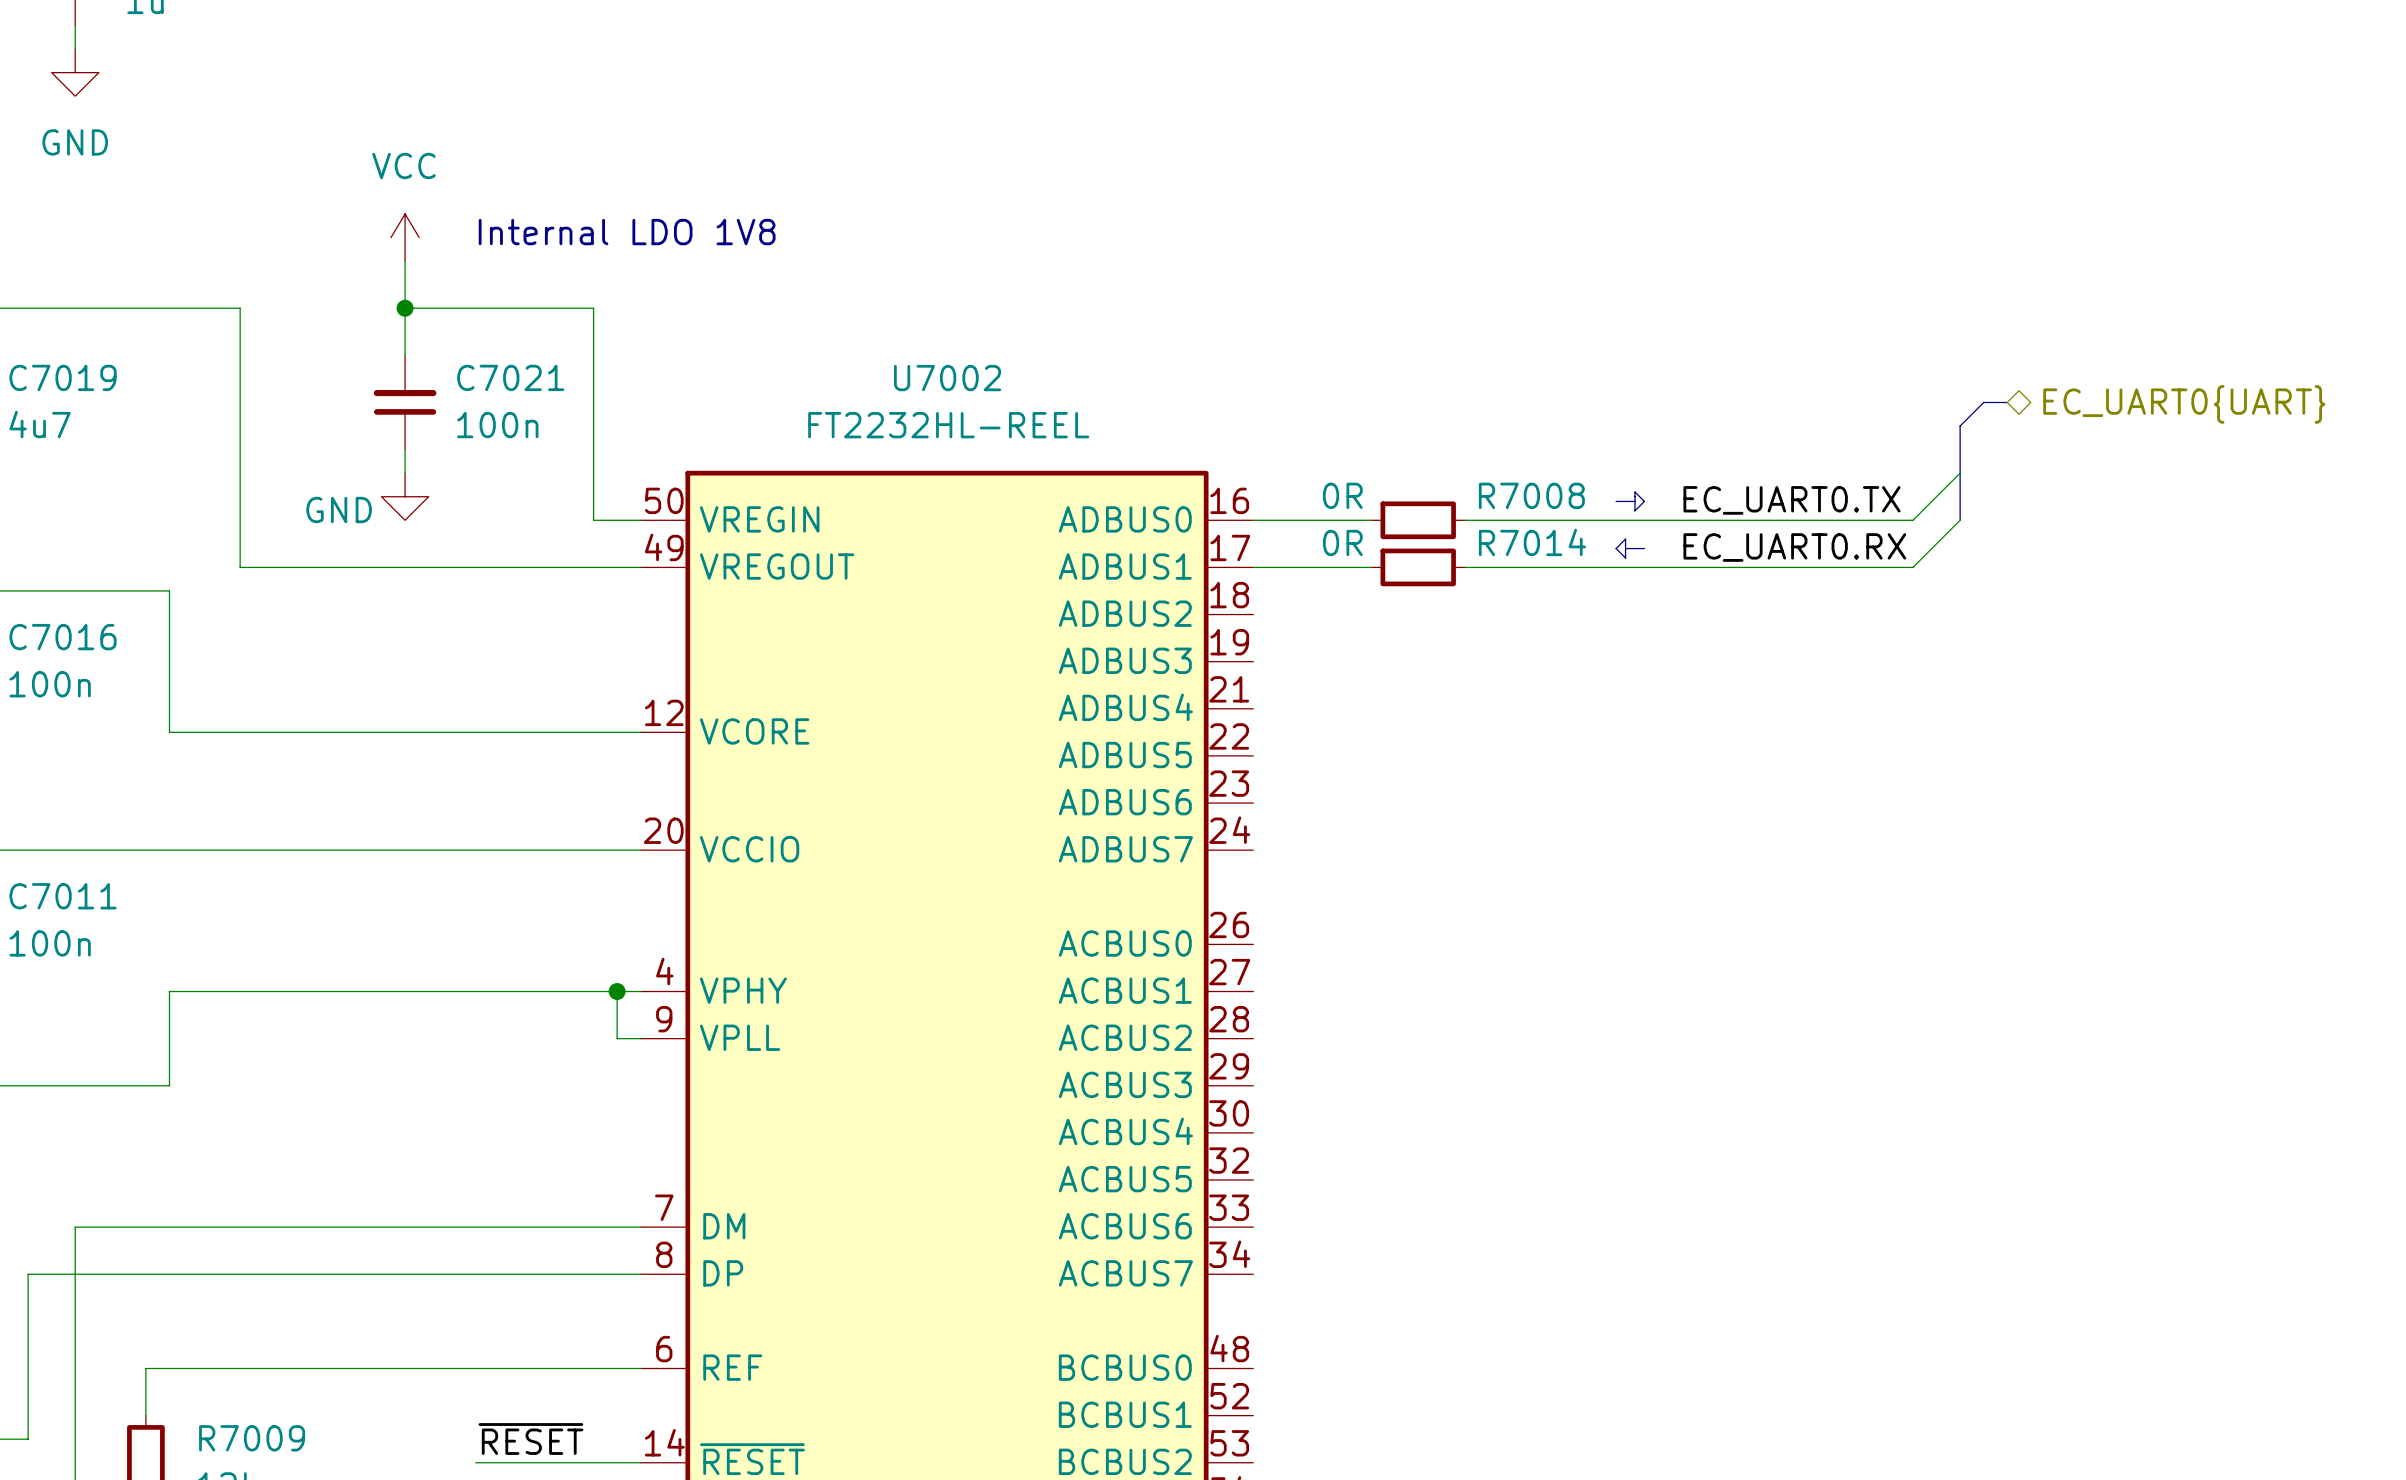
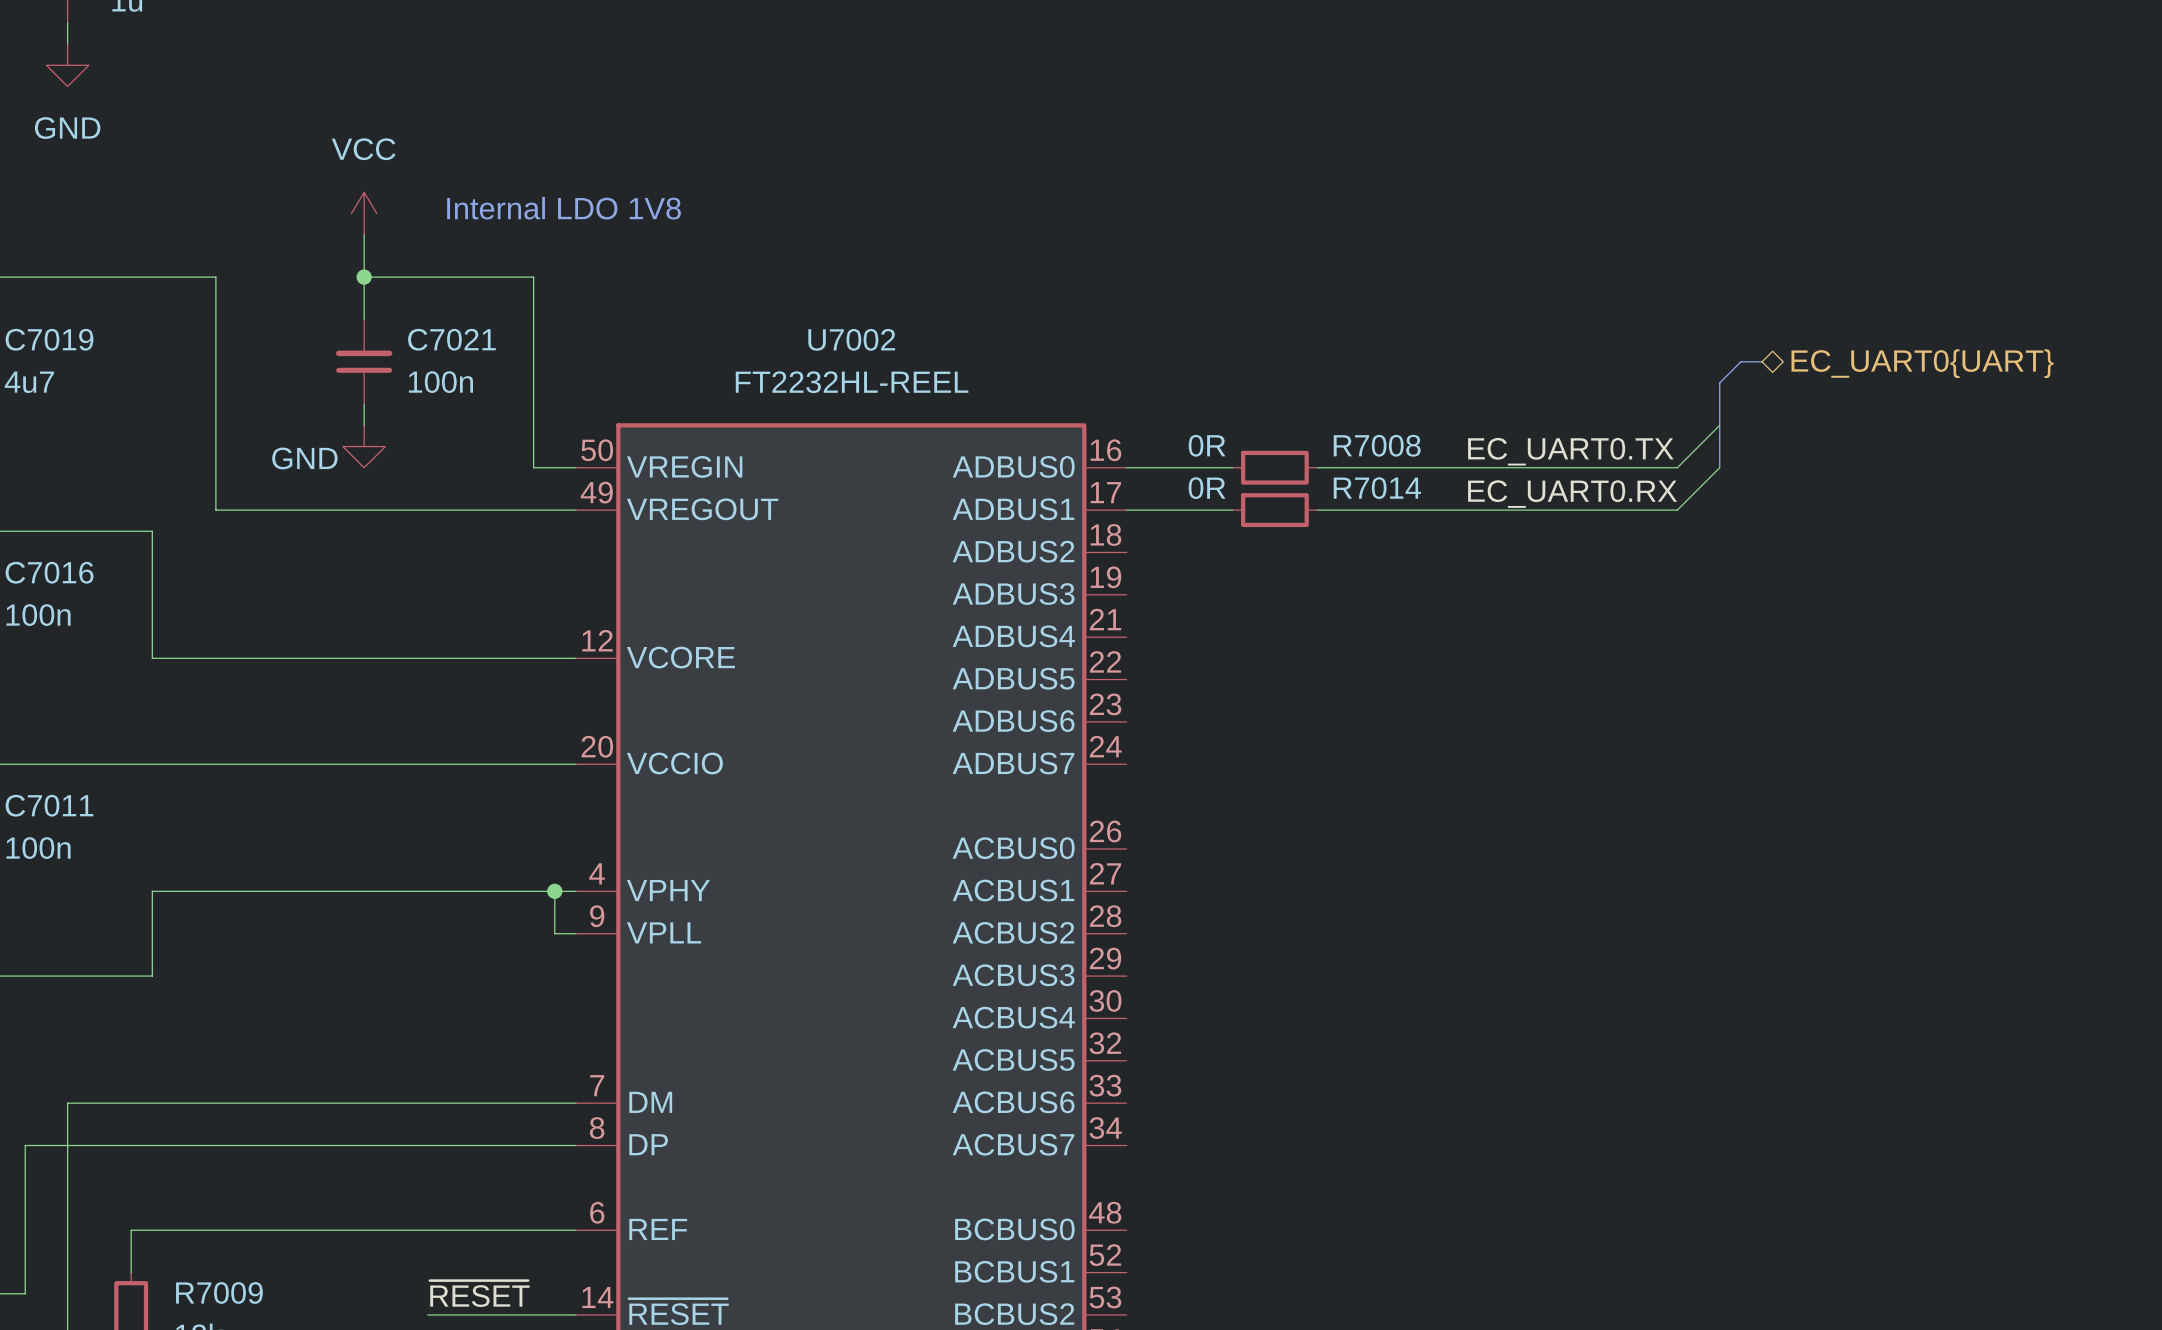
bus: (2007, 402) (1983, 402) (1960, 426) (1960, 520) -> (1762, 361) (1740, 361) (1719, 383) (1719, 467)
hierarchical label position: EC_UART0{UART} (2184, 404) -> EC_UART0{UART} (1922, 363)
wire: (1960, 473) (1913, 520) (1865, 520) -> (1719, 425) (1677, 467)
line: (1634, 492) (1634, 510) (1644, 501) (1634, 492) -> none
label position: EC_UART0.TX (1792, 500) -> EC_UART0.TX (1570, 451)
line: (1616, 501) (1634, 501) -> none
wire: (1960, 520) (1913, 567) (1865, 567) -> (1719, 467) (1677, 510)
line: (1625, 539) (1625, 557) (1616, 548) (1625, 539) -> none
label position: EC_UART0.RX (1794, 547) -> EC_UART0.RX (1572, 494)
line: (1625, 548) (1644, 548) -> none

